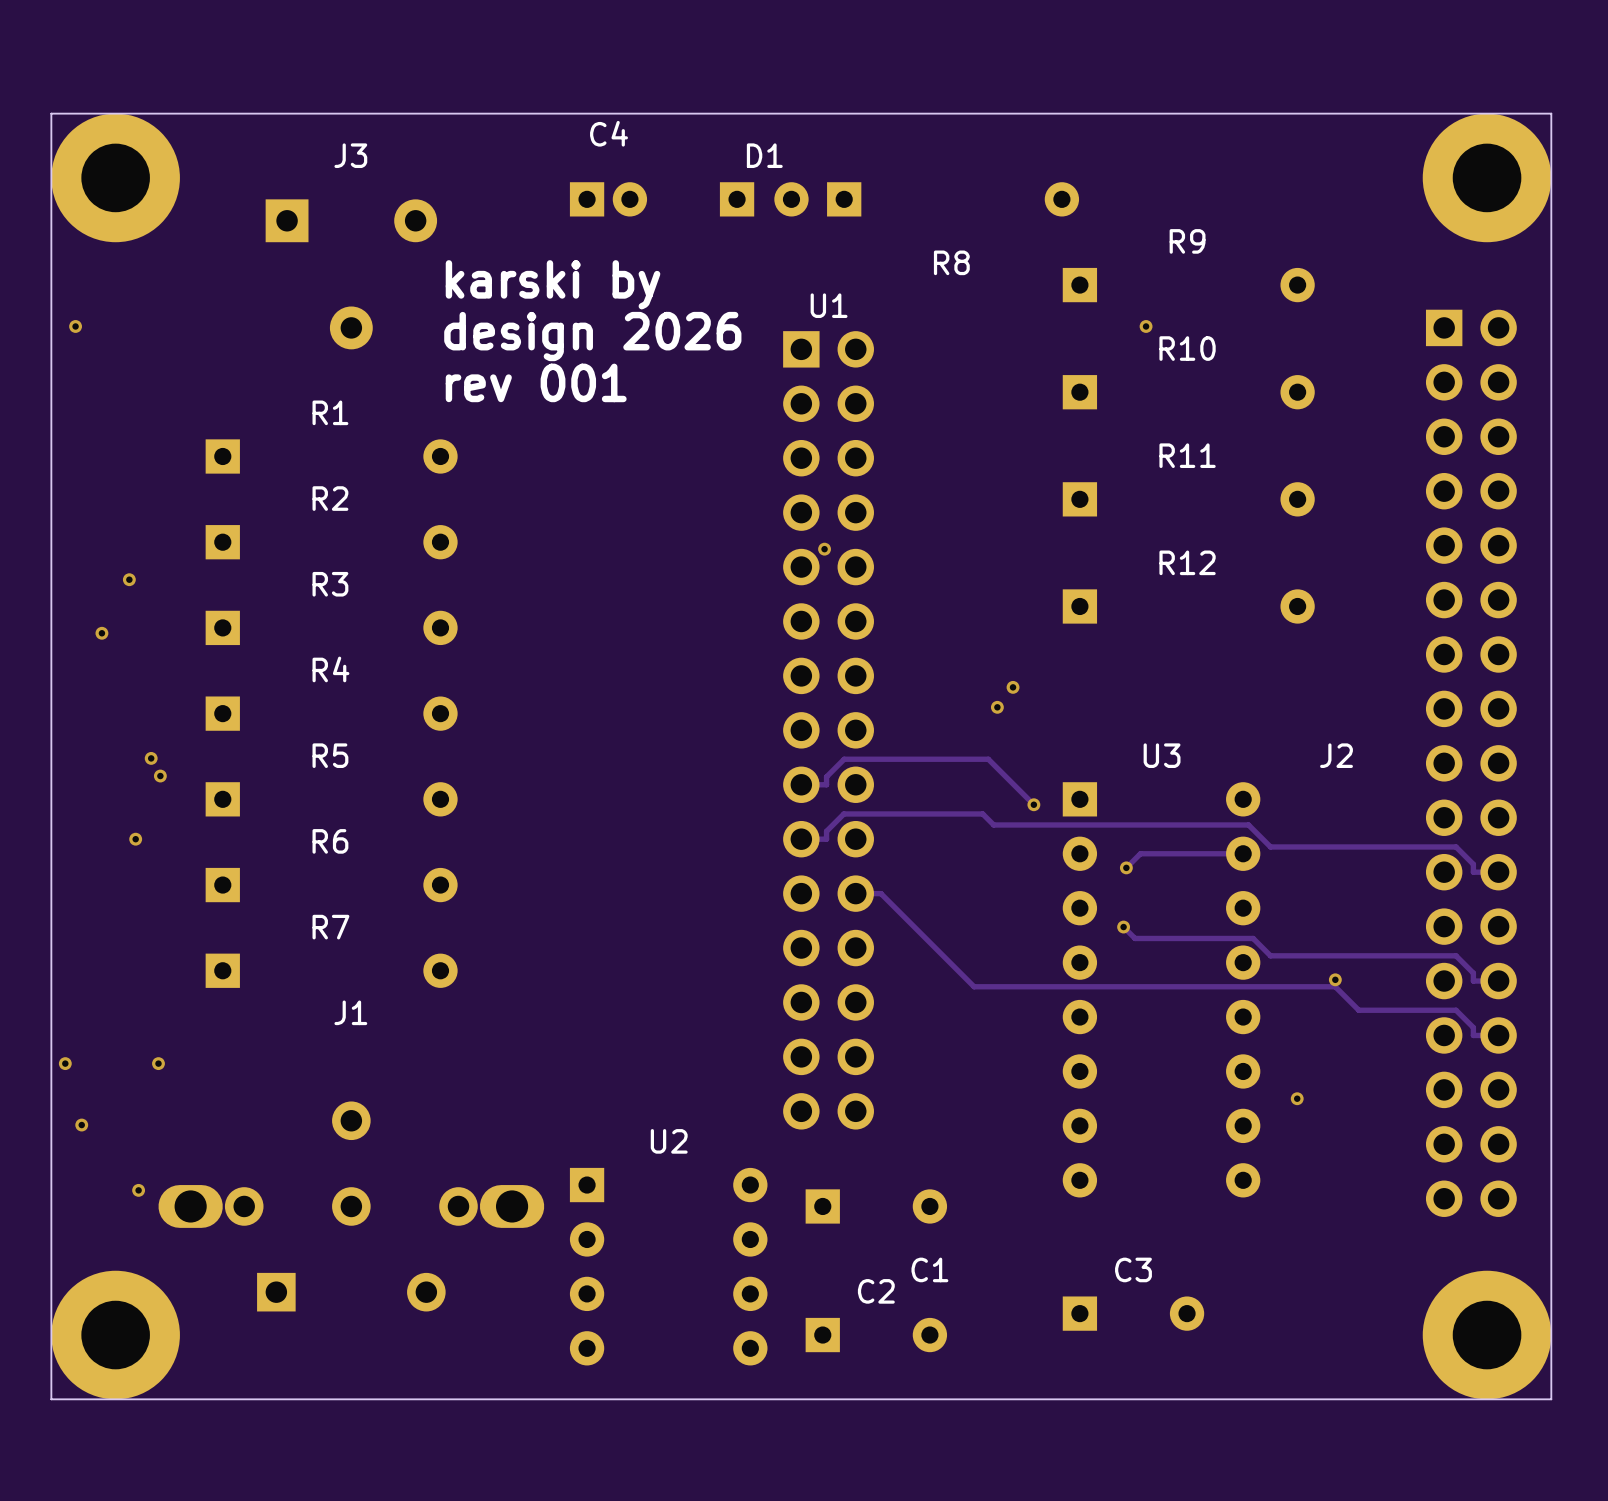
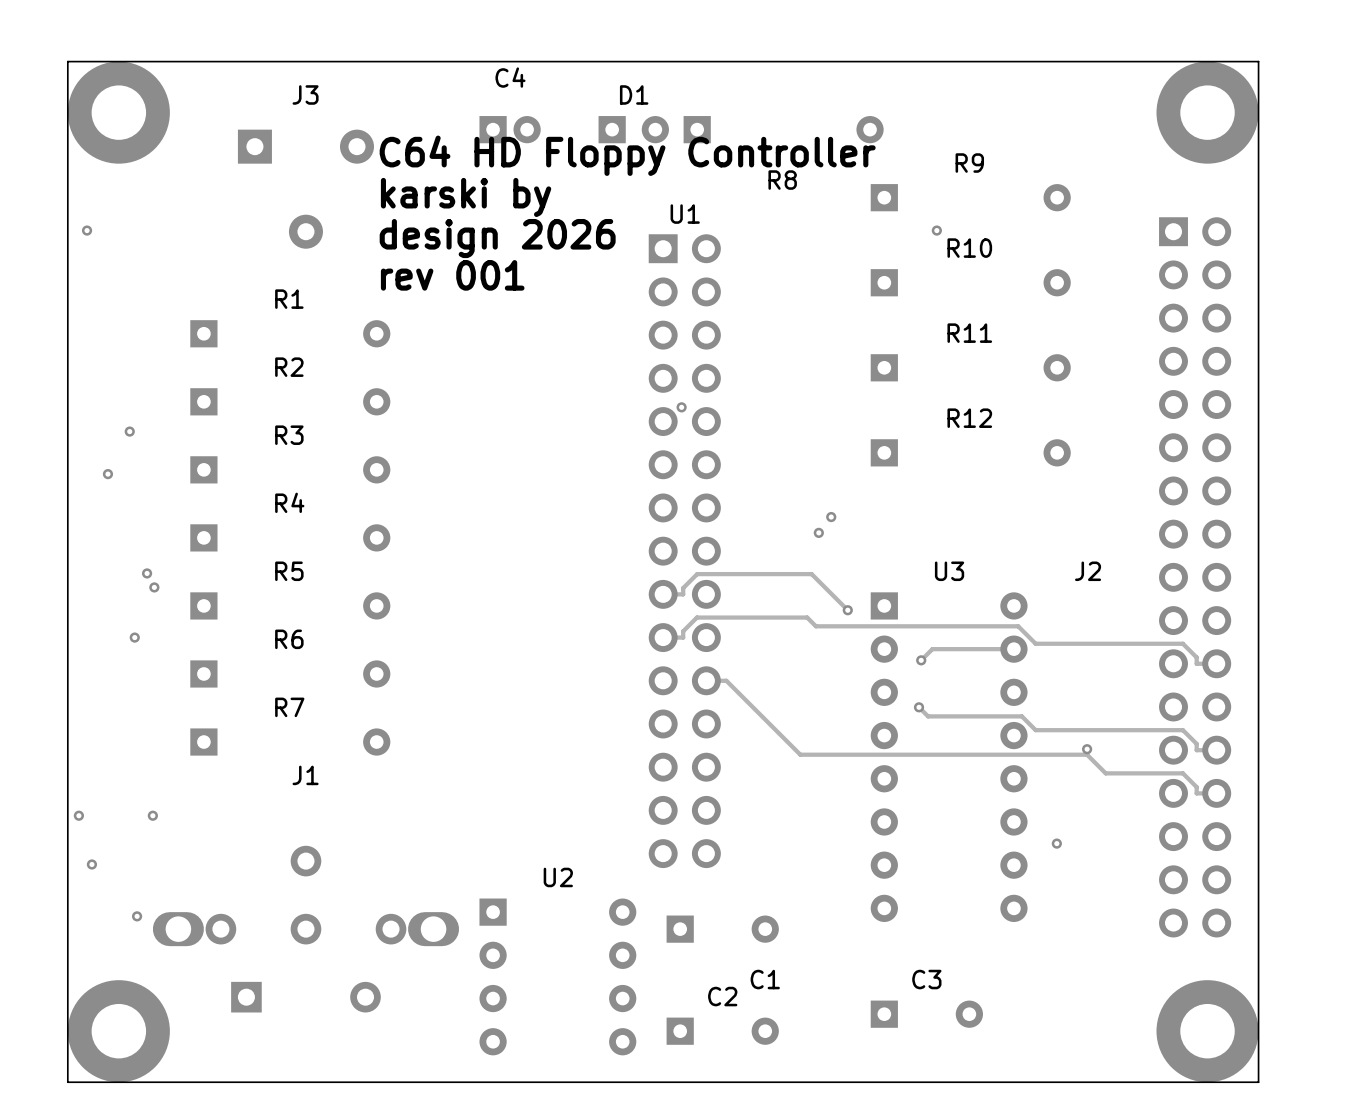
text: none -> C64 HD Floppy Controller (627, 155)

